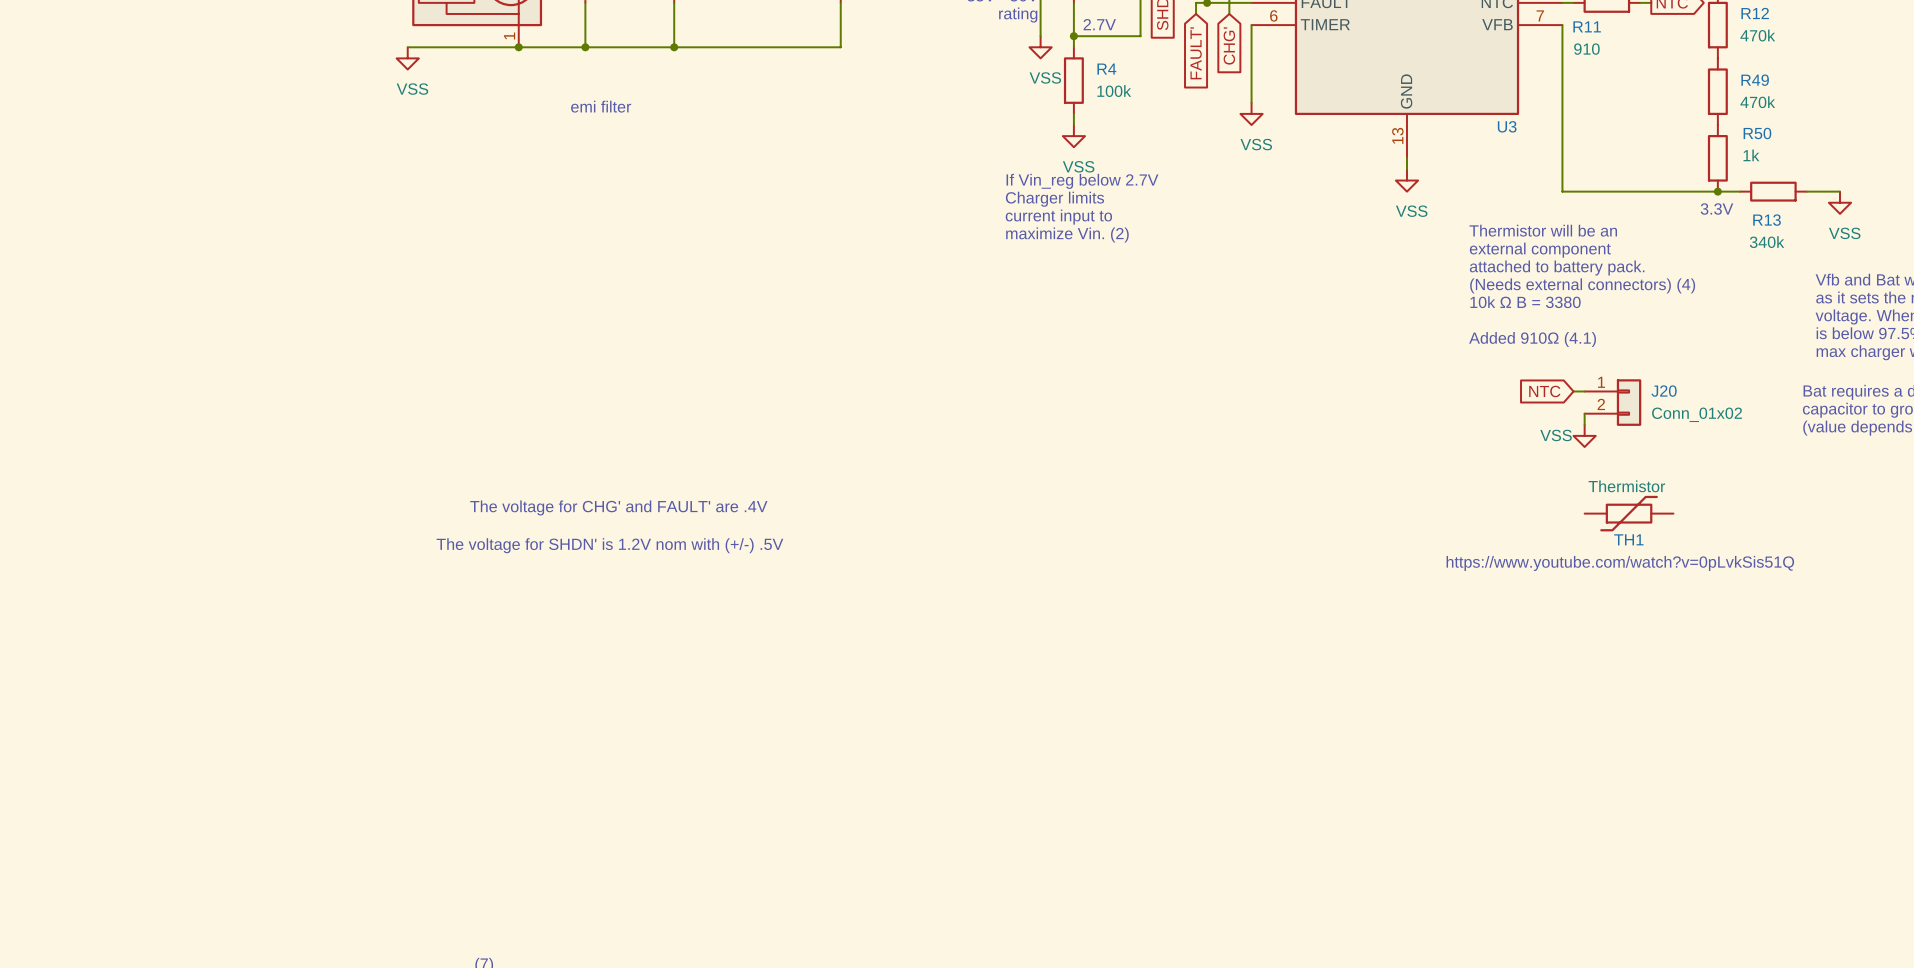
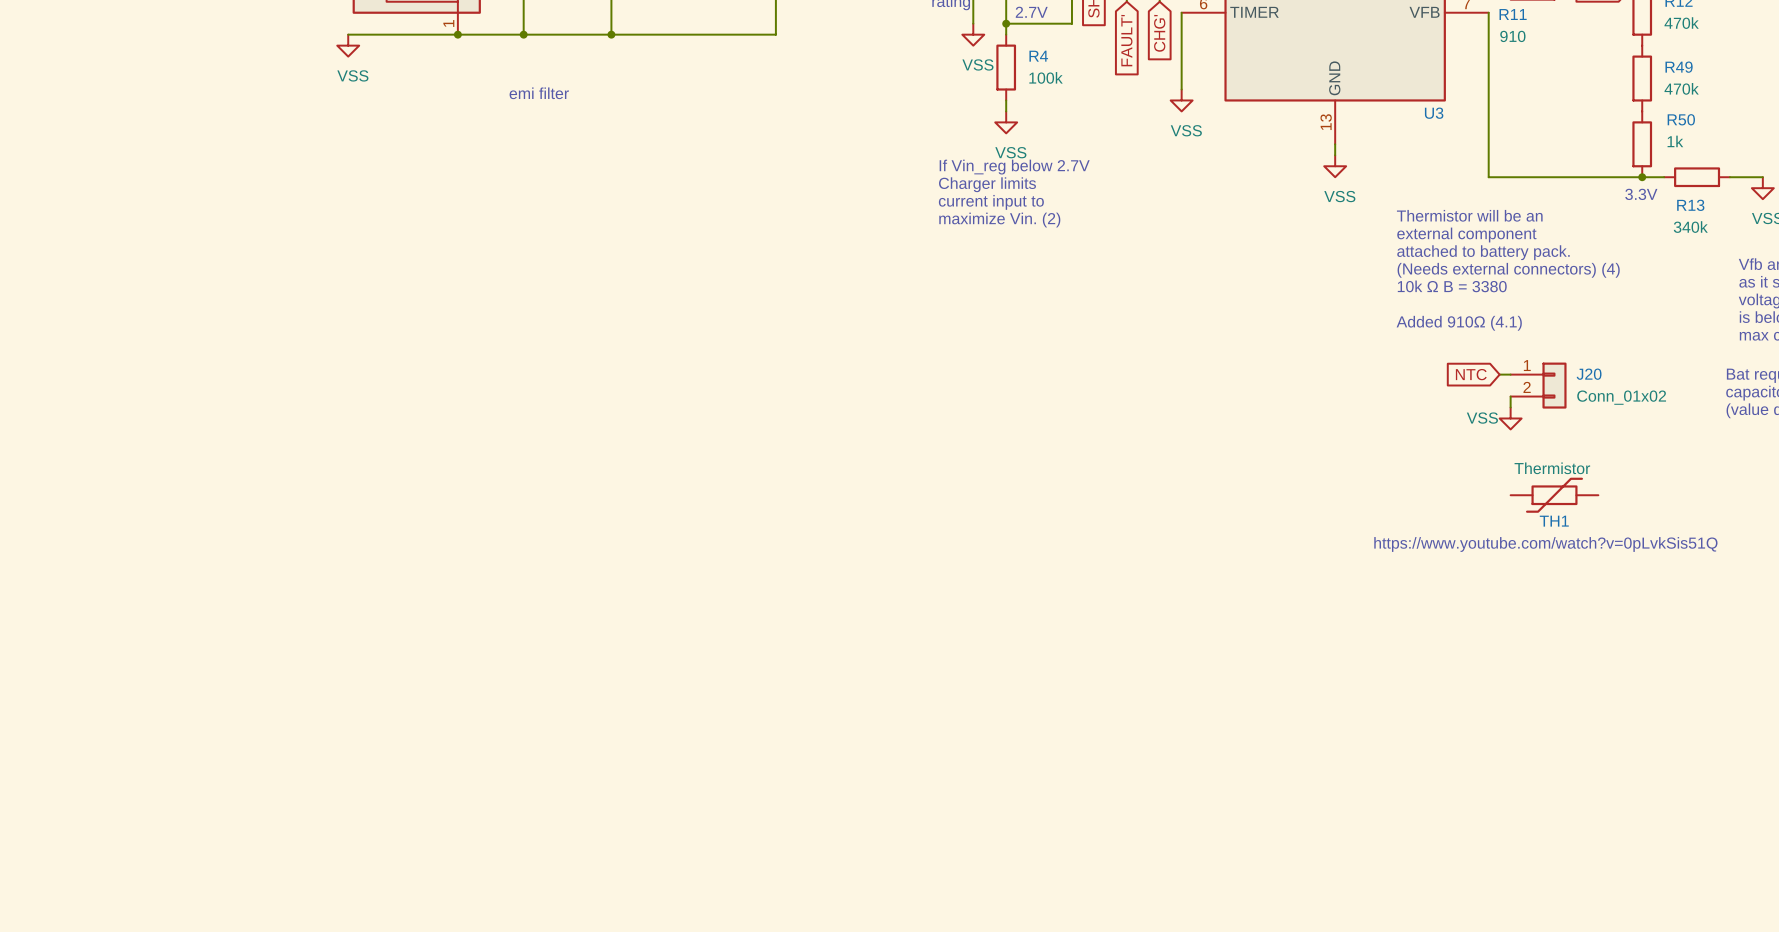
text: The voltage for CHG' and FAULT' are .4V (618, 507) -> none
text: The voltage for SHDN' is 1.2V nom with (+/-) .5V (609, 545) -> none

